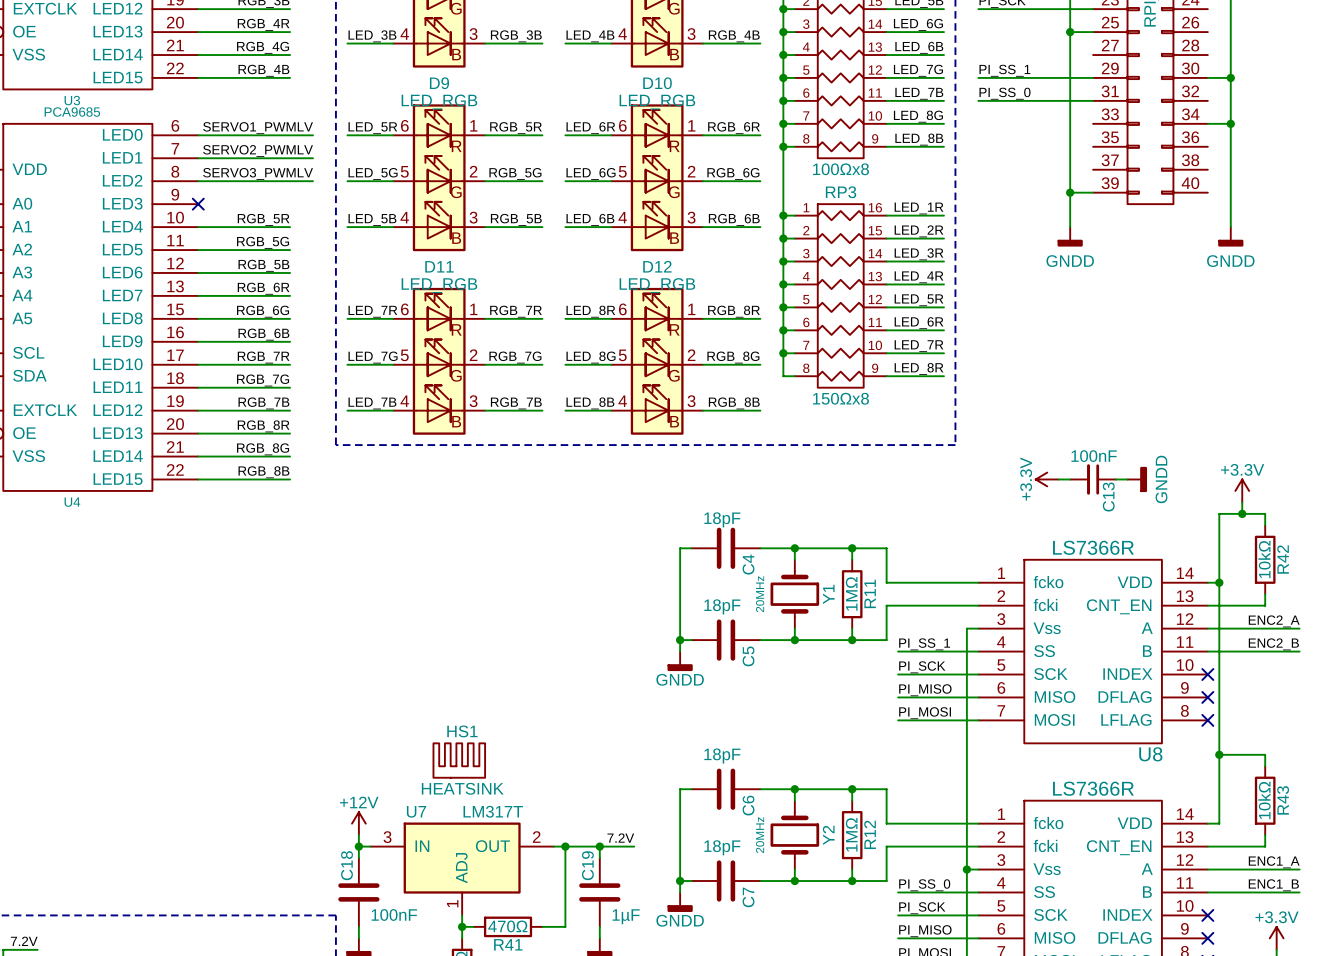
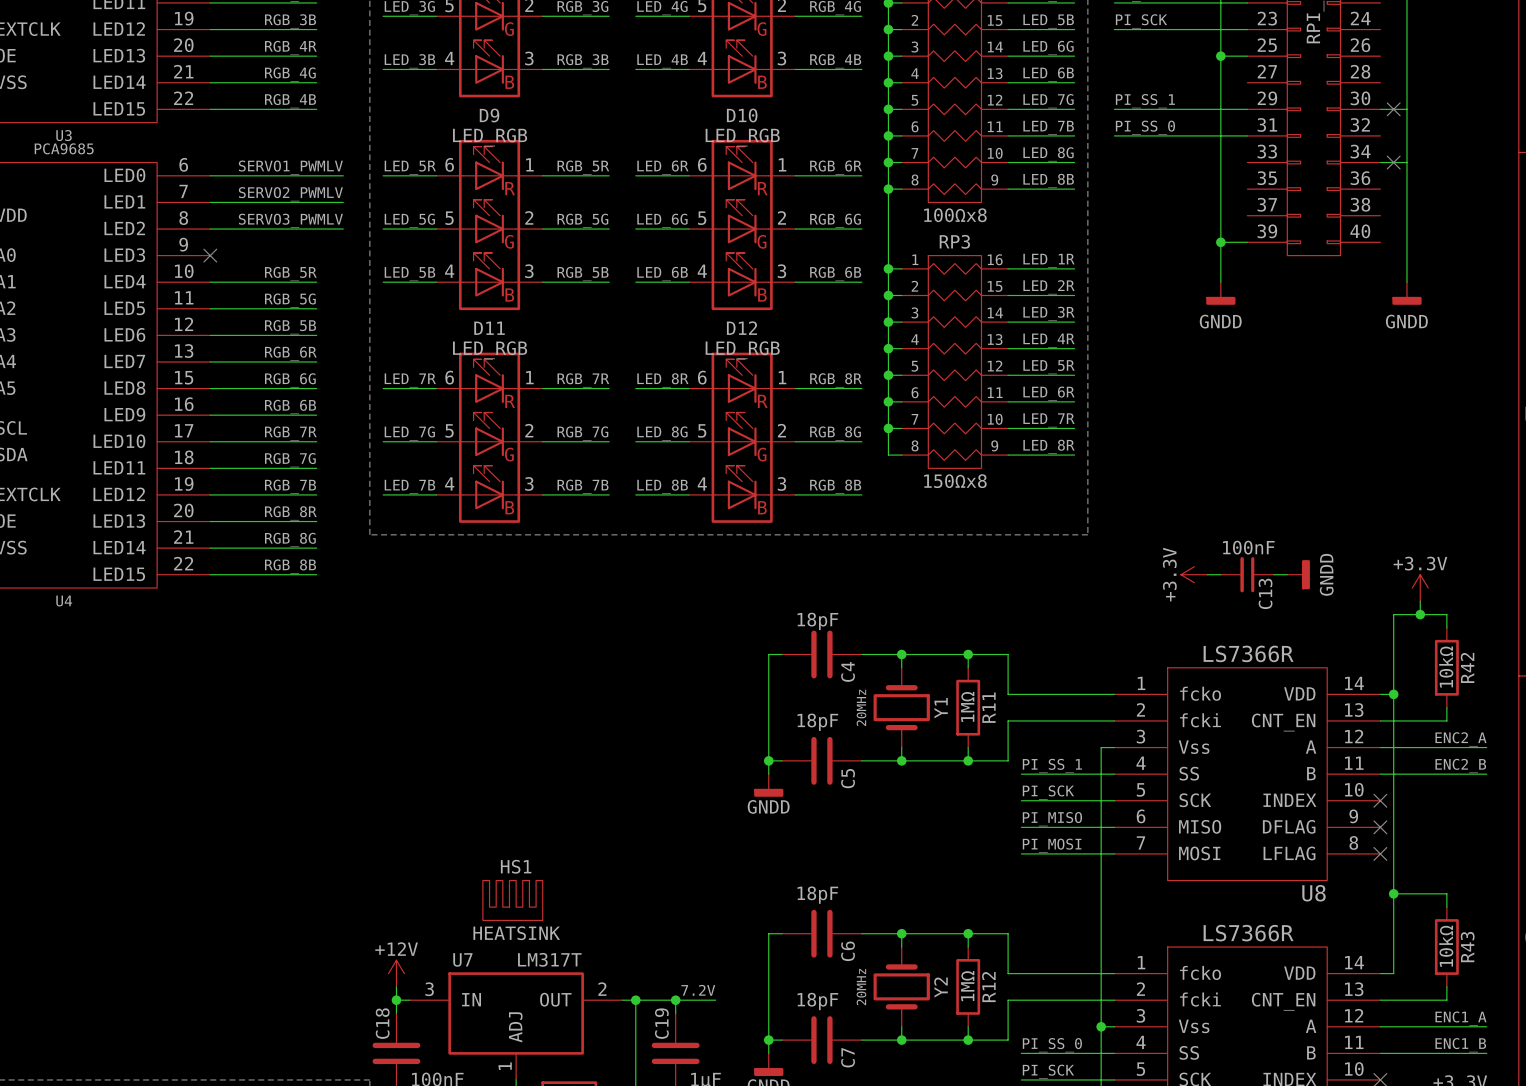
no-connect mark: none -> (1393, 109)
junction: (1230, 77) -> none
no-connect mark: none -> (1393, 162)
junction: (1230, 123) -> none

